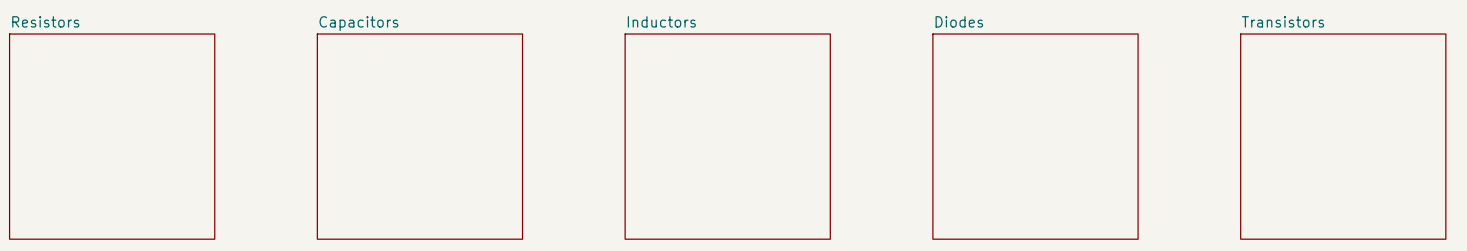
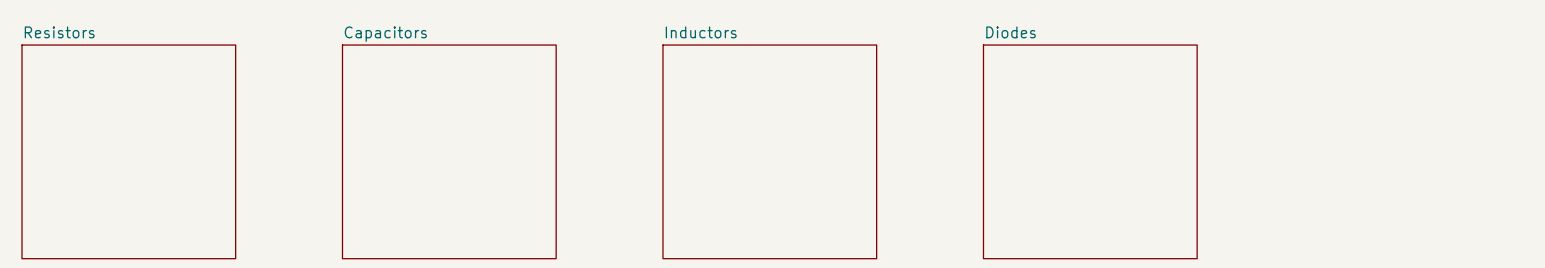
sheet Transistors: (1343, 136) -> none

